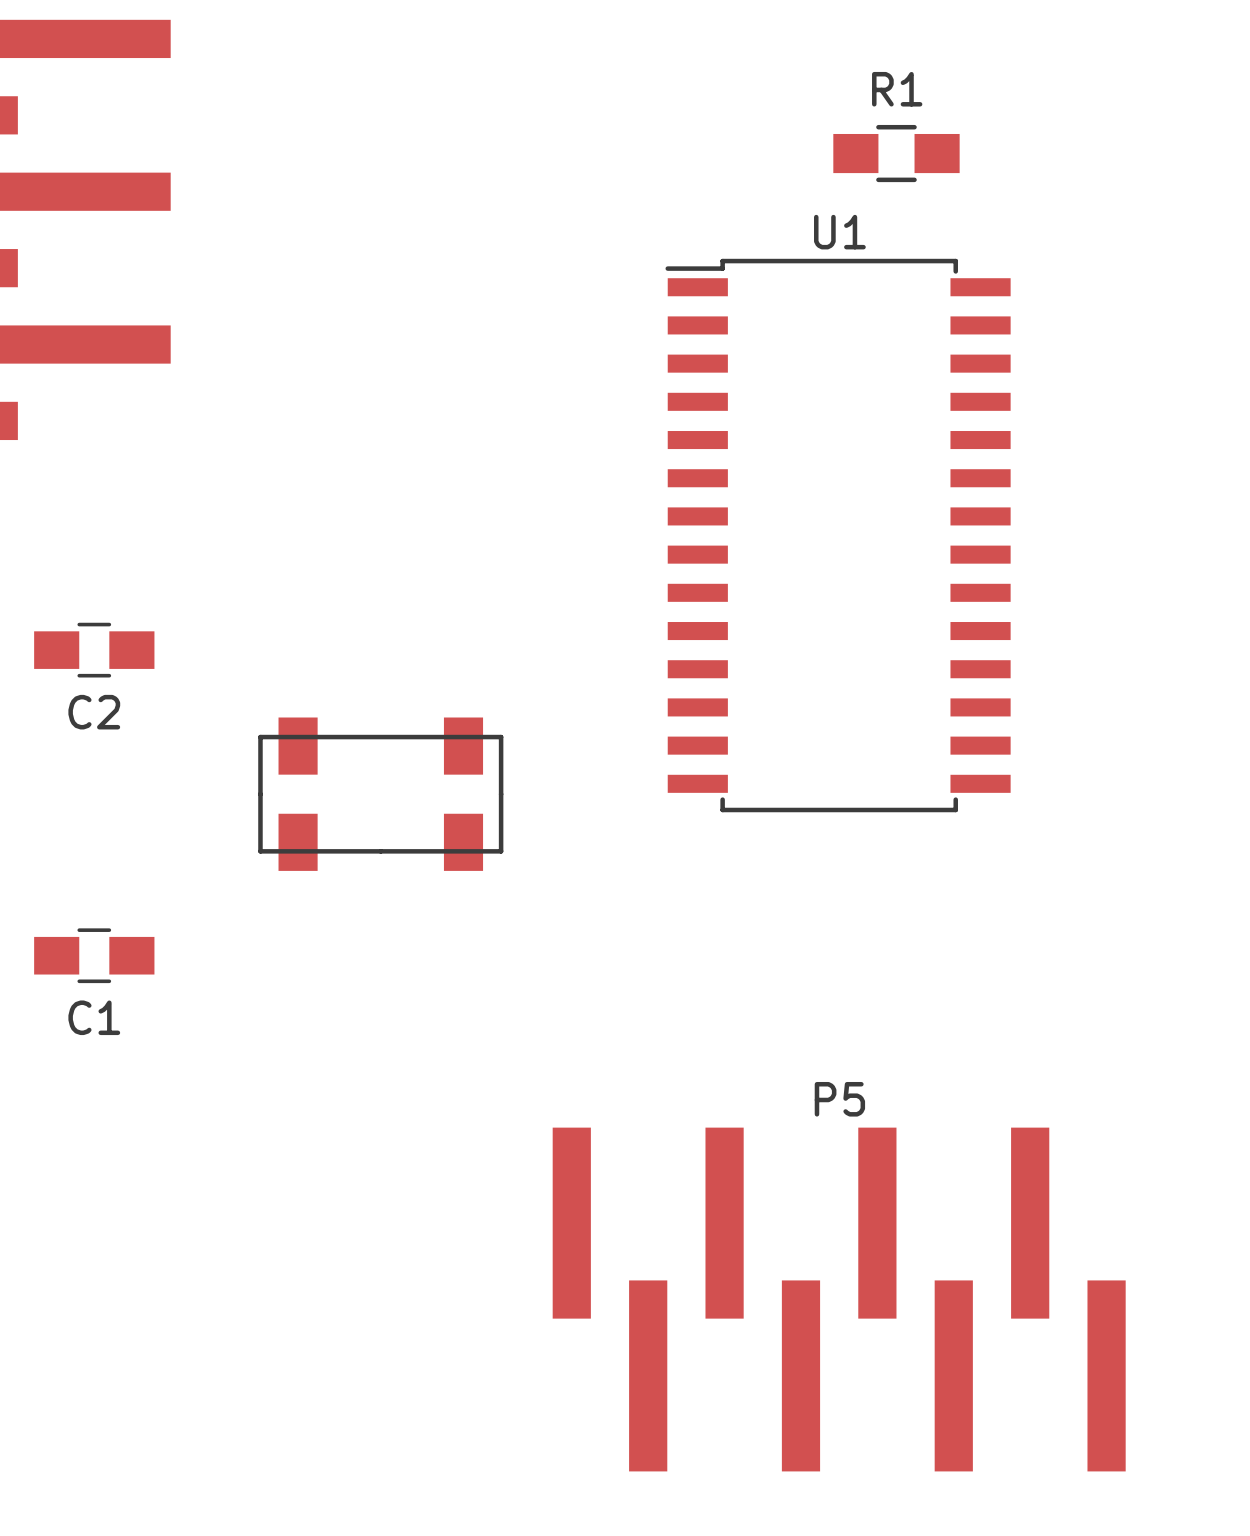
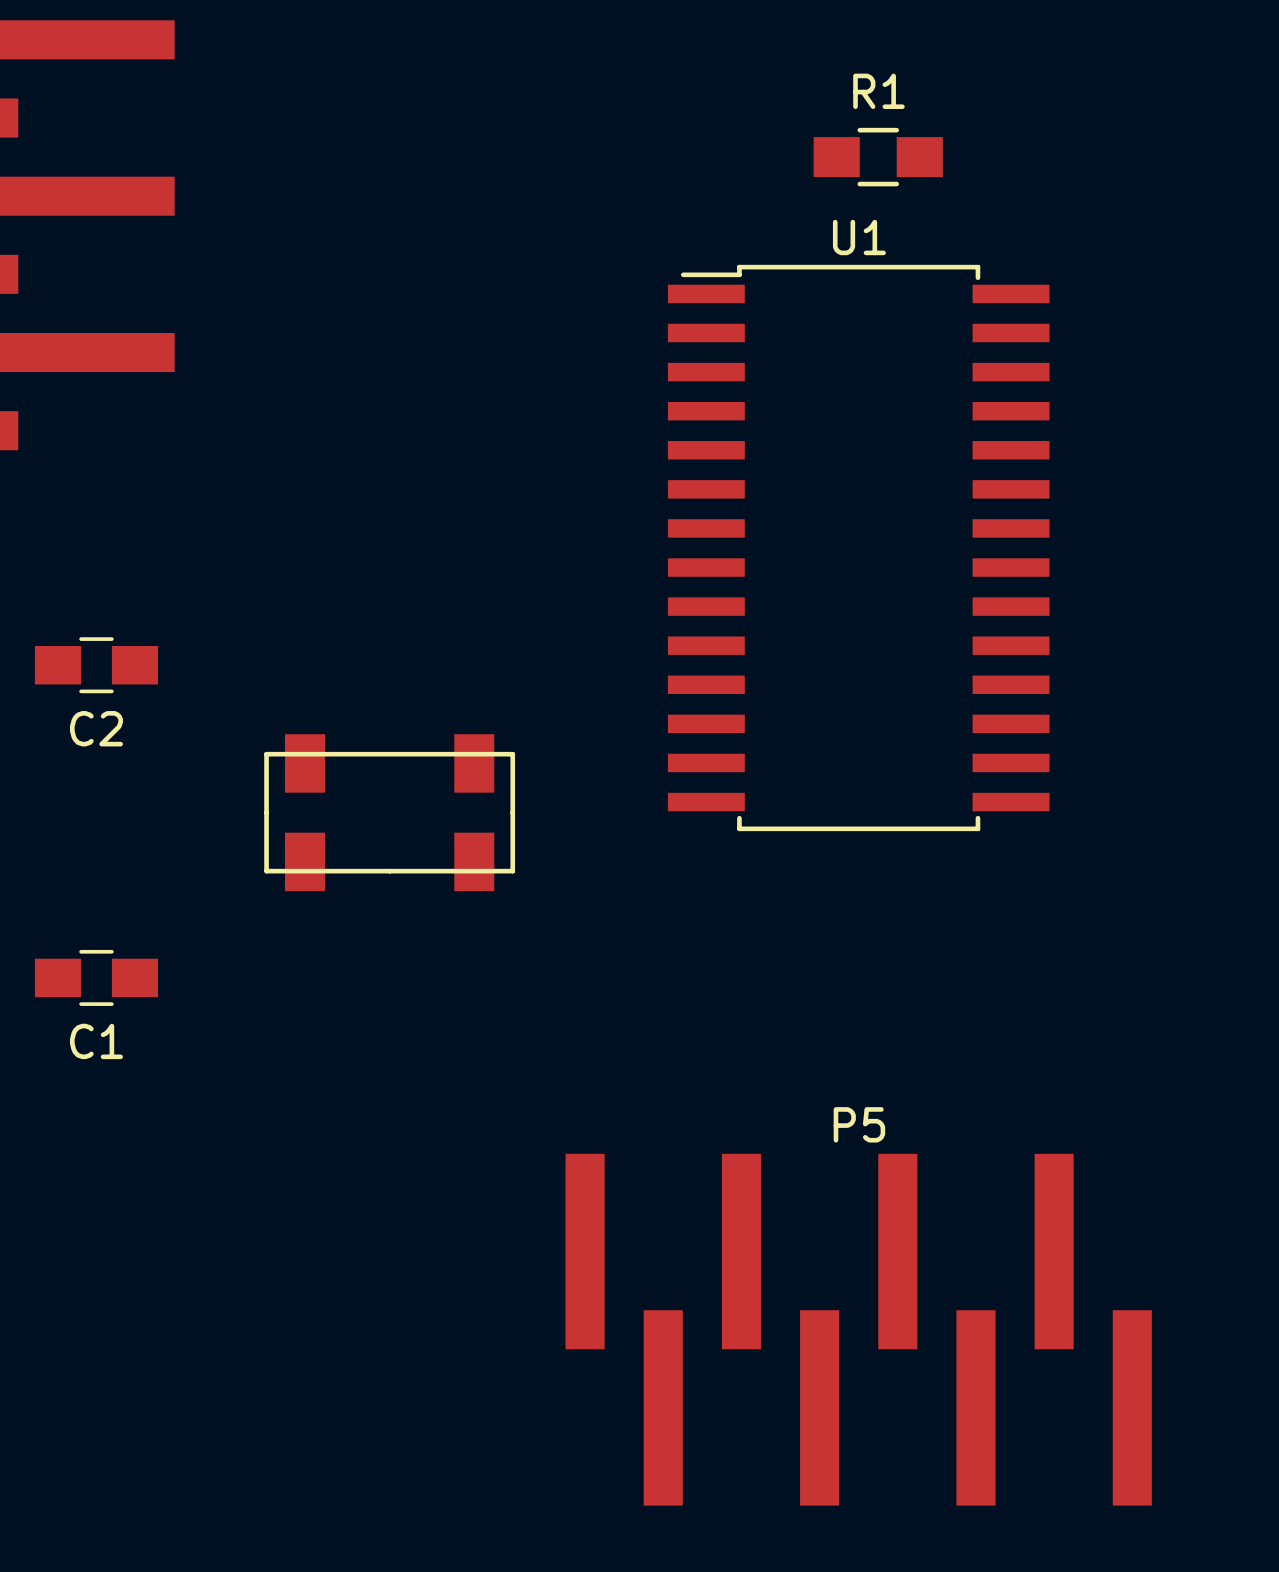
R1 position: (896, 153) -> (878, 157)
U1 footprint: [665, 258, 1011, 813] -> [667, 264, 1050, 832]

